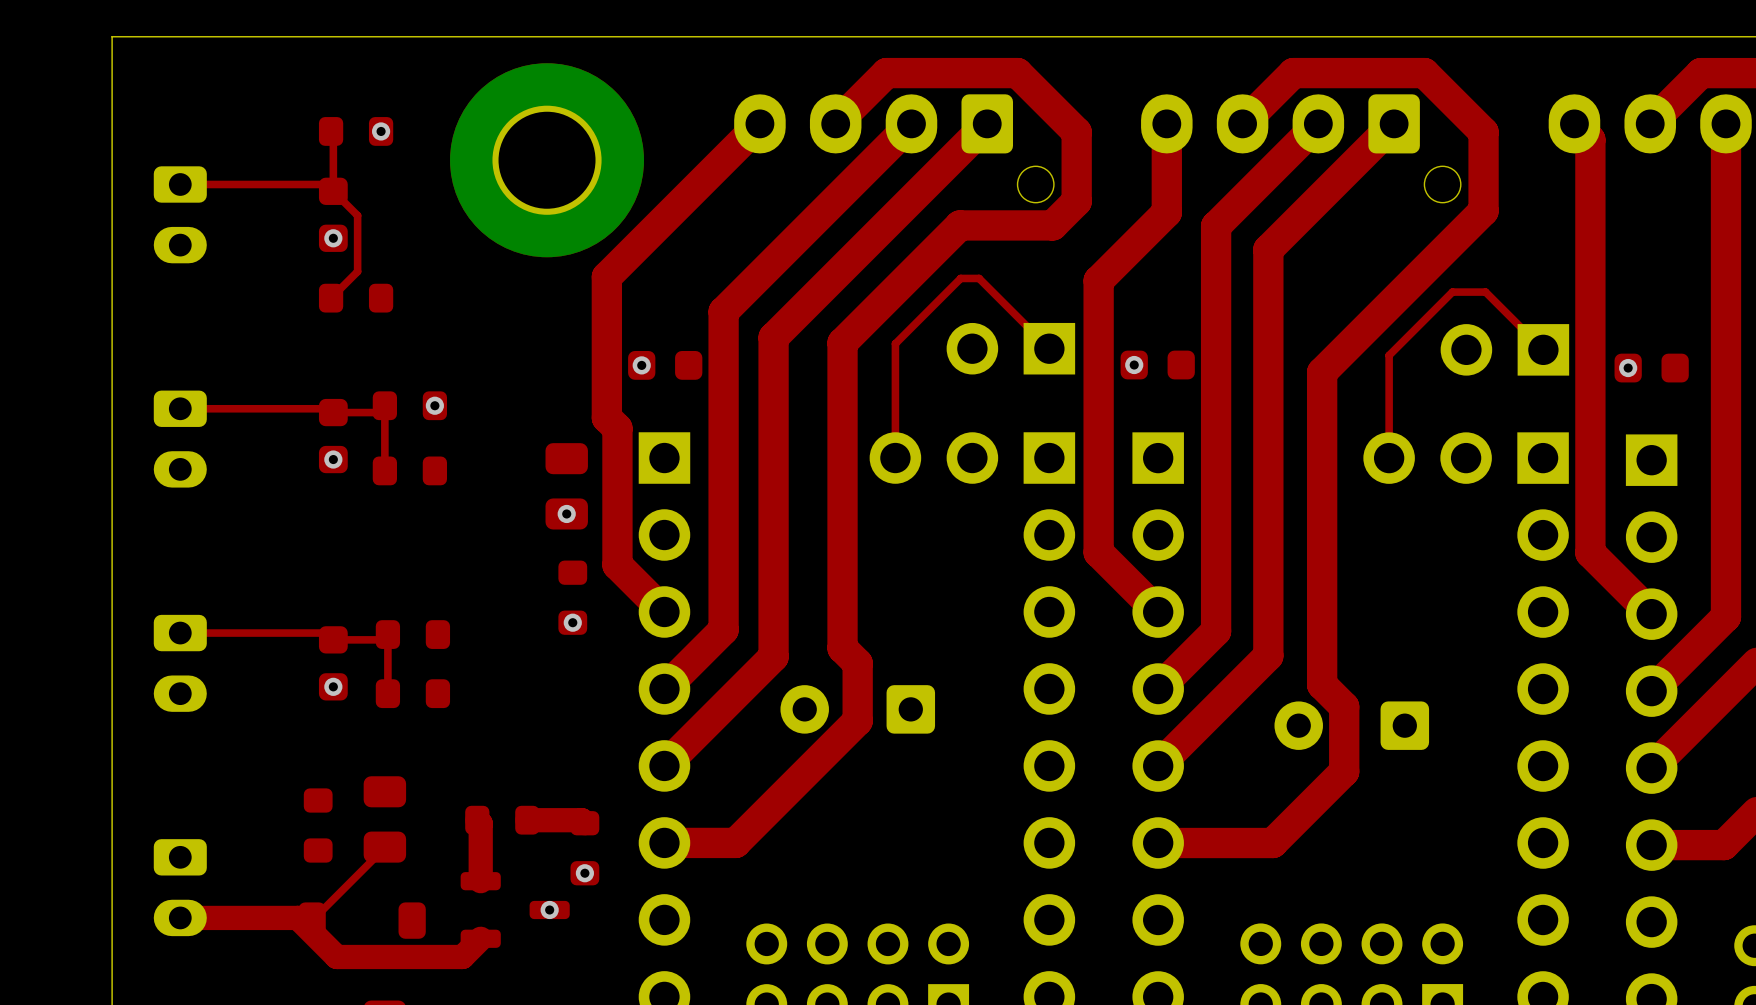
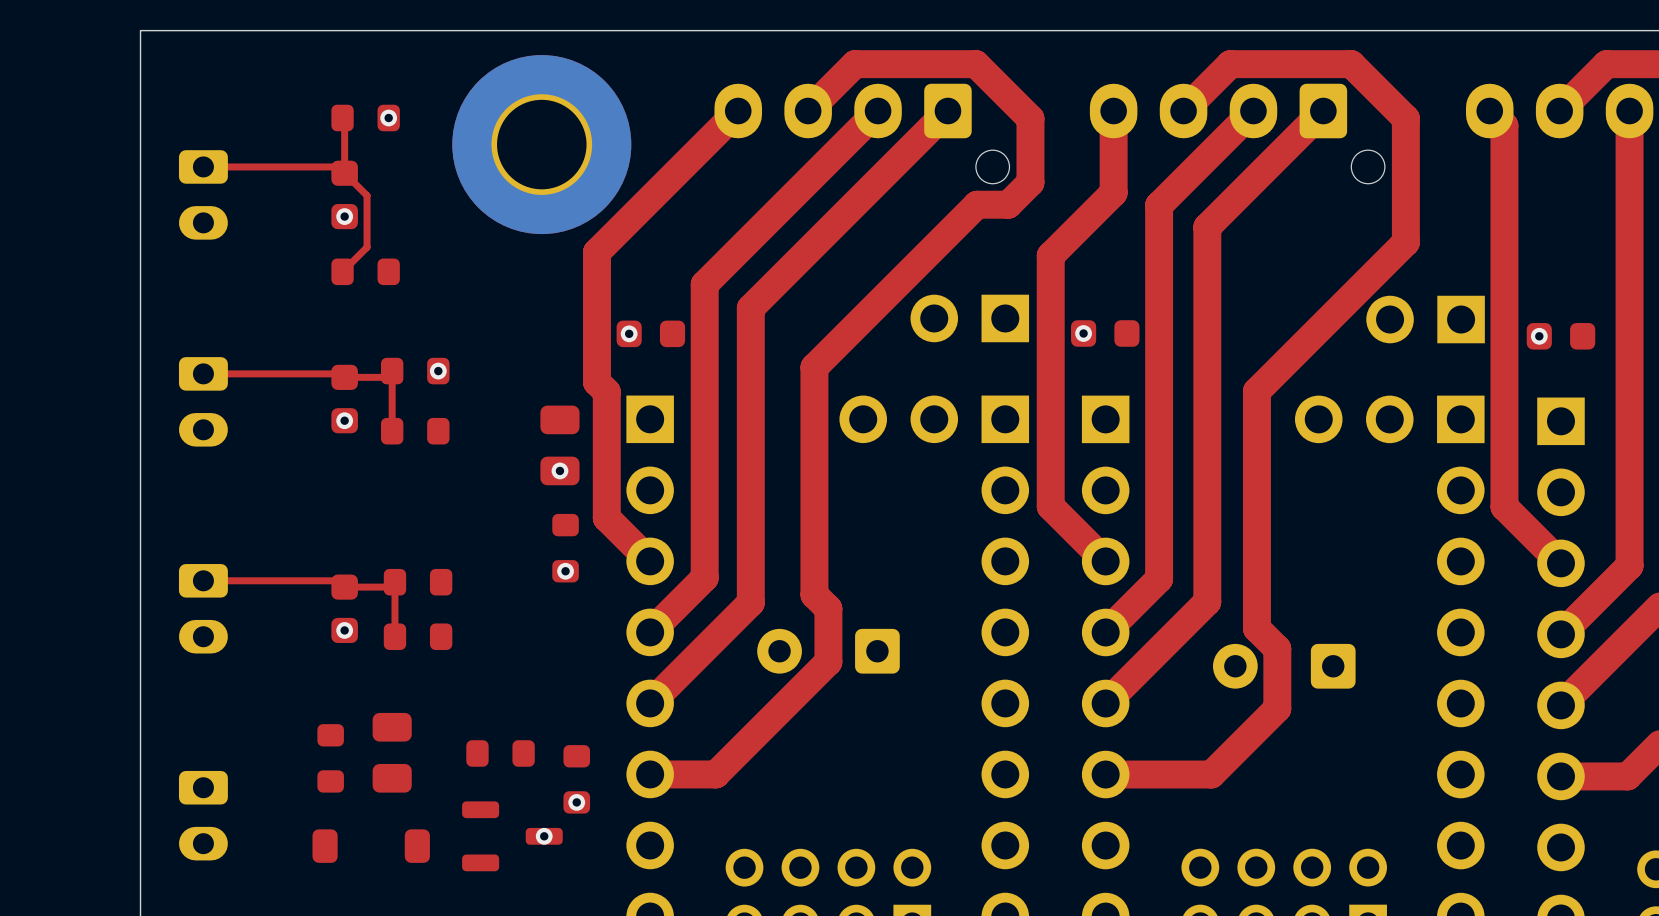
top track: (1483, 210) (1322, 372) (1322, 427) -> (1405, 191) (1405, 242) (1256, 391)
top track: (1018, 225) (959, 225) (842, 342) (842, 401) -> (977, 204) (814, 367)
top track: (1049, 348) (979, 278) (960, 278) (895, 343) (895, 458) -> none
top track: (1543, 349) (1485, 292) (1452, 292) (1389, 355) (1389, 458) -> none
top track: (477, 820) (480, 823) (480, 881) -> none
top track: (527, 820) (581, 820) (584, 823) -> none
top track: (384, 847) (312, 920) (309, 917) (180, 917) -> none
top track: (297, 917) (336, 956) (462, 956) (480, 938) -> none

